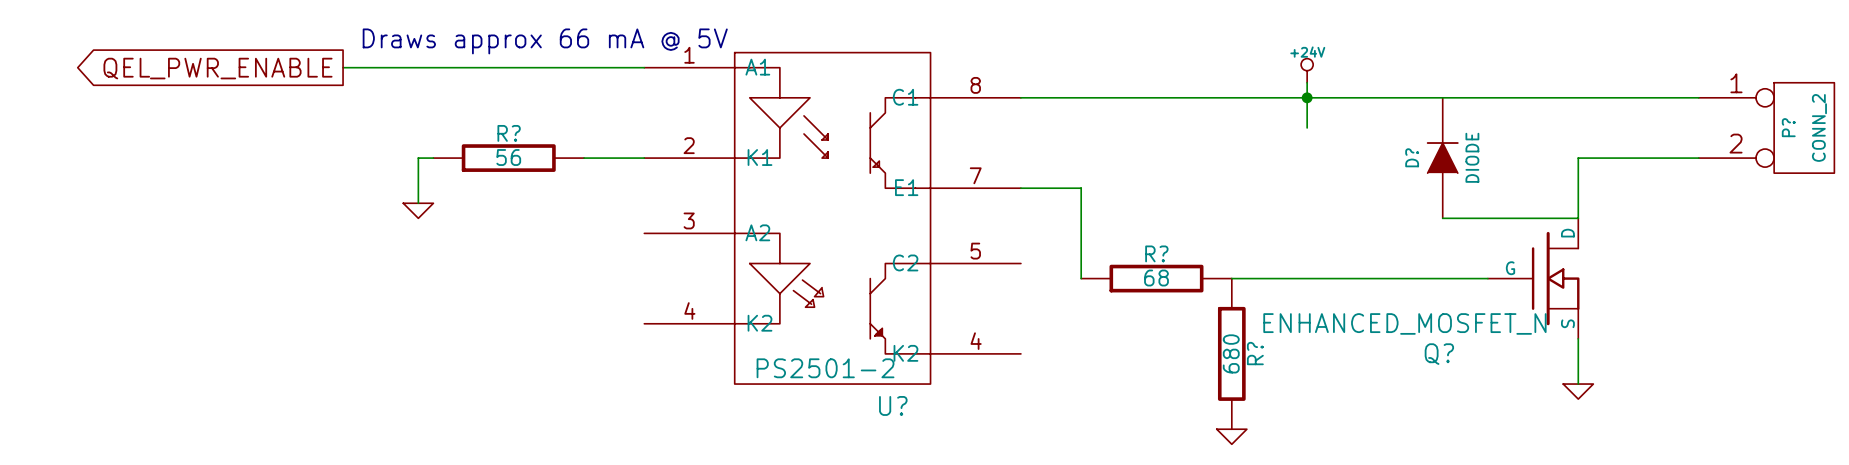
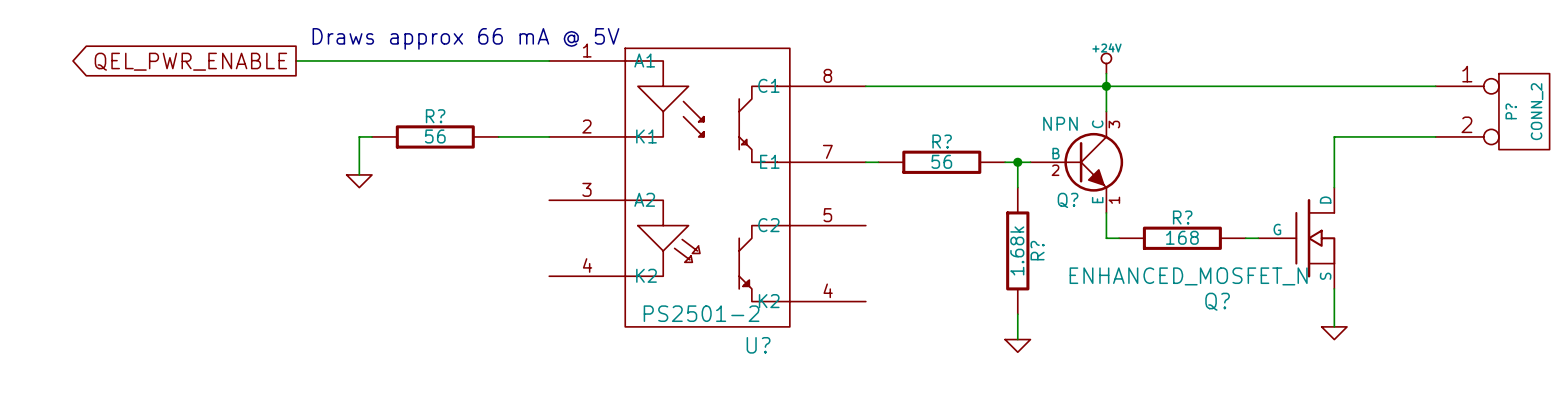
D?: DIODE (1442, 158) -> none
wire: (1035, 188) (1081, 188) (1081, 278) -> none
R?: none -> 56 (941, 162)
wire: none -> (1005, 162) (1030, 162)
wire: none -> (1017, 162) (1017, 187)
junction: none -> (1017, 162)
Q?: none -> NPN (1076, 162)
wire: (1442, 218) (1578, 218) -> none
R?: 68 (1156, 278) -> none
wire: (1231, 278) (1307, 278) -> (1106, 212) (1106, 238)
wire: (1322, 278) (1472, 278) -> none
R?: none -> 168 (1182, 238)
R?: none -> 1.68k (1017, 250)
R?: 680 (1231, 353) -> none
wire: none -> (1017, 314) (1017, 339)
power symbol position: (1231, 436) -> (1017, 345)

